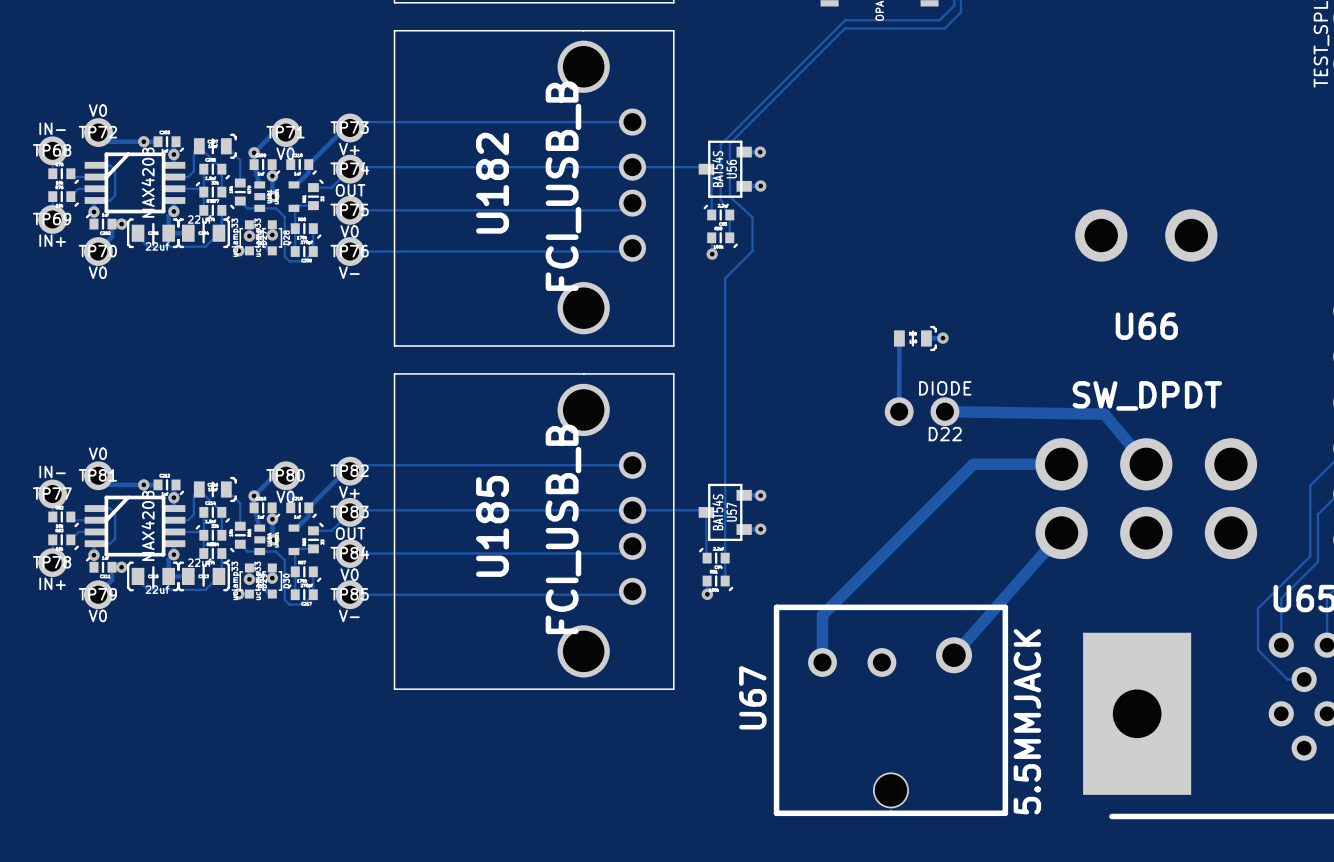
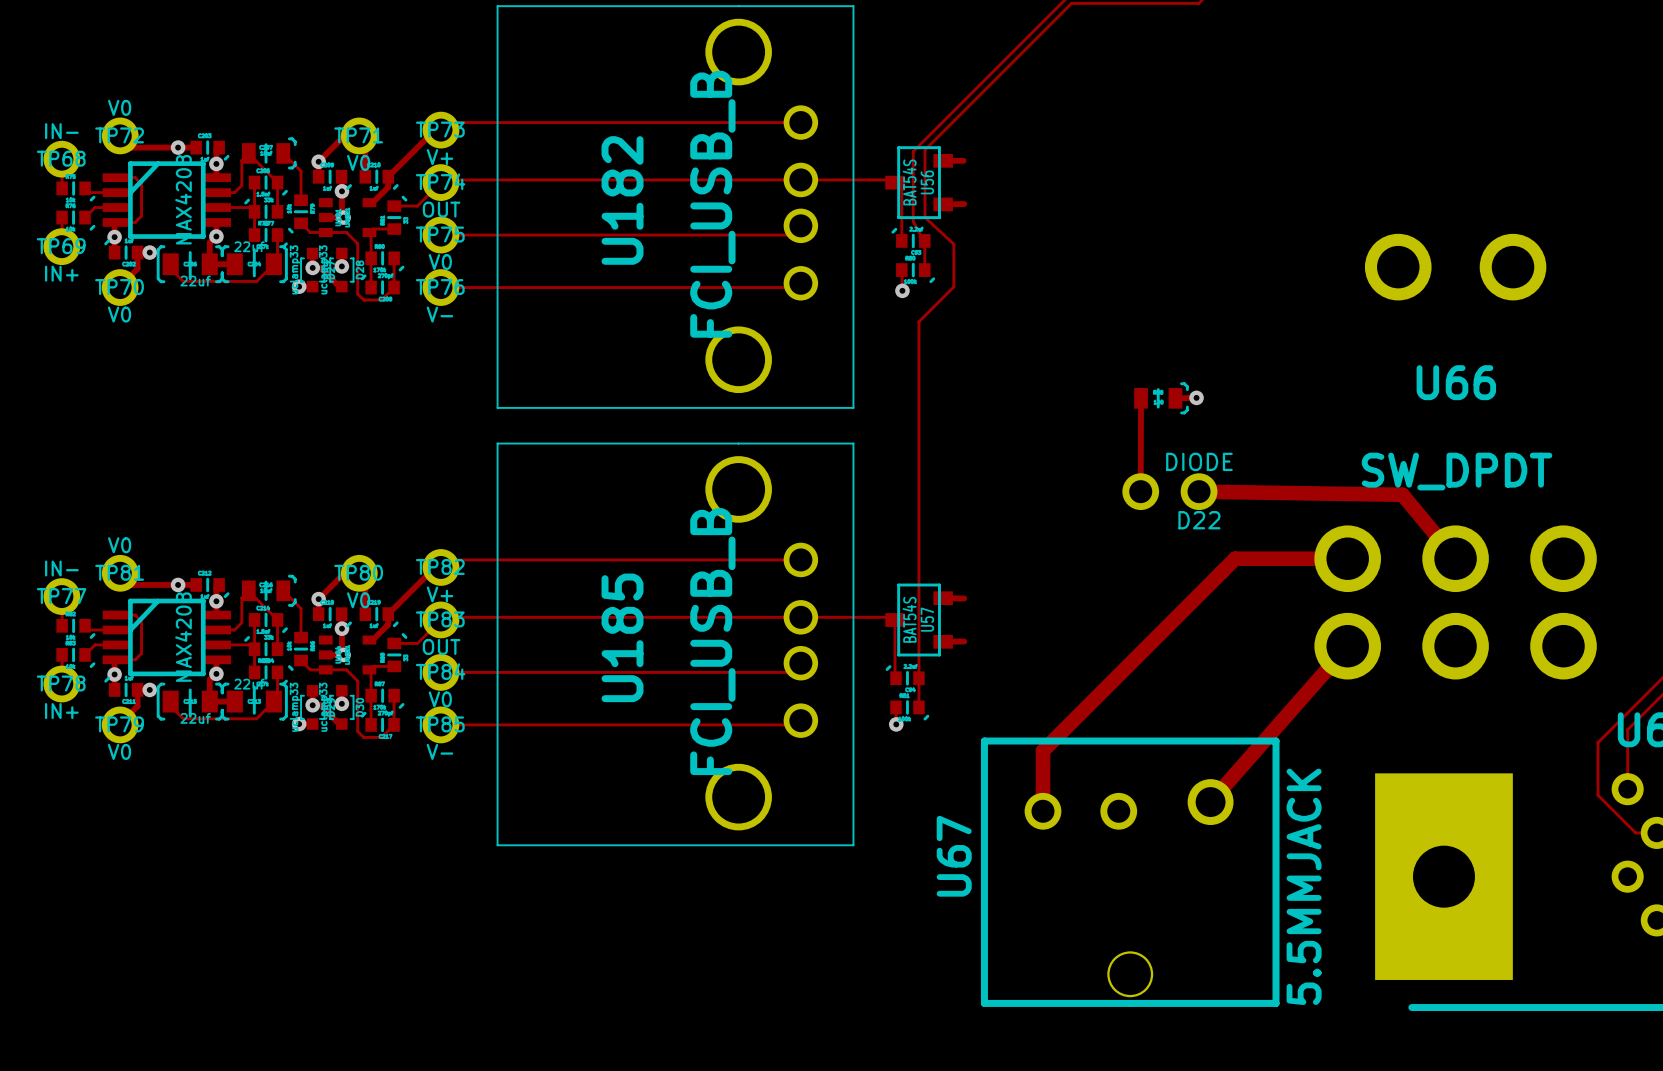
via: (760, 152) -> none
track: (254, 164) (259, 184) -> none
via: (760, 186) -> none
via: (760, 495) -> none
track: (254, 507) (259, 528) -> none
via: (760, 529) -> none

